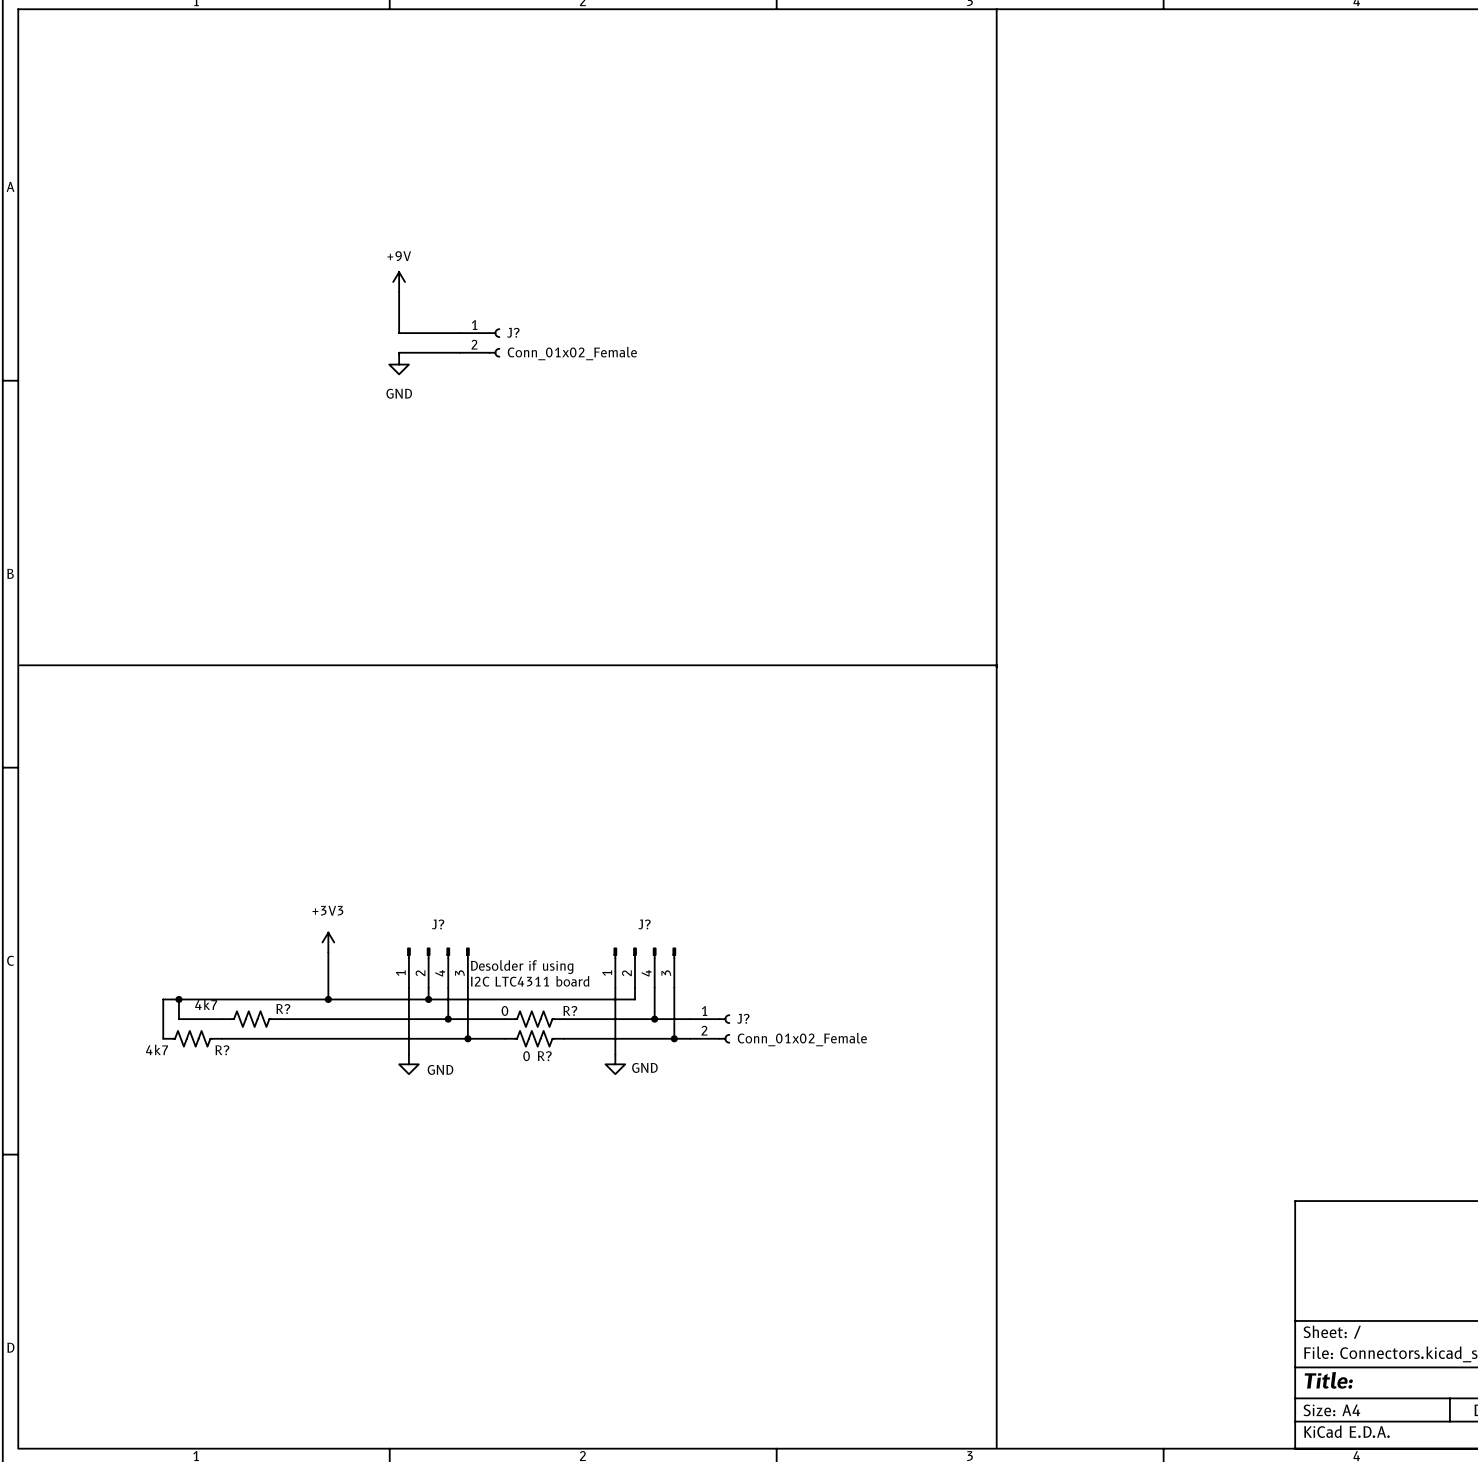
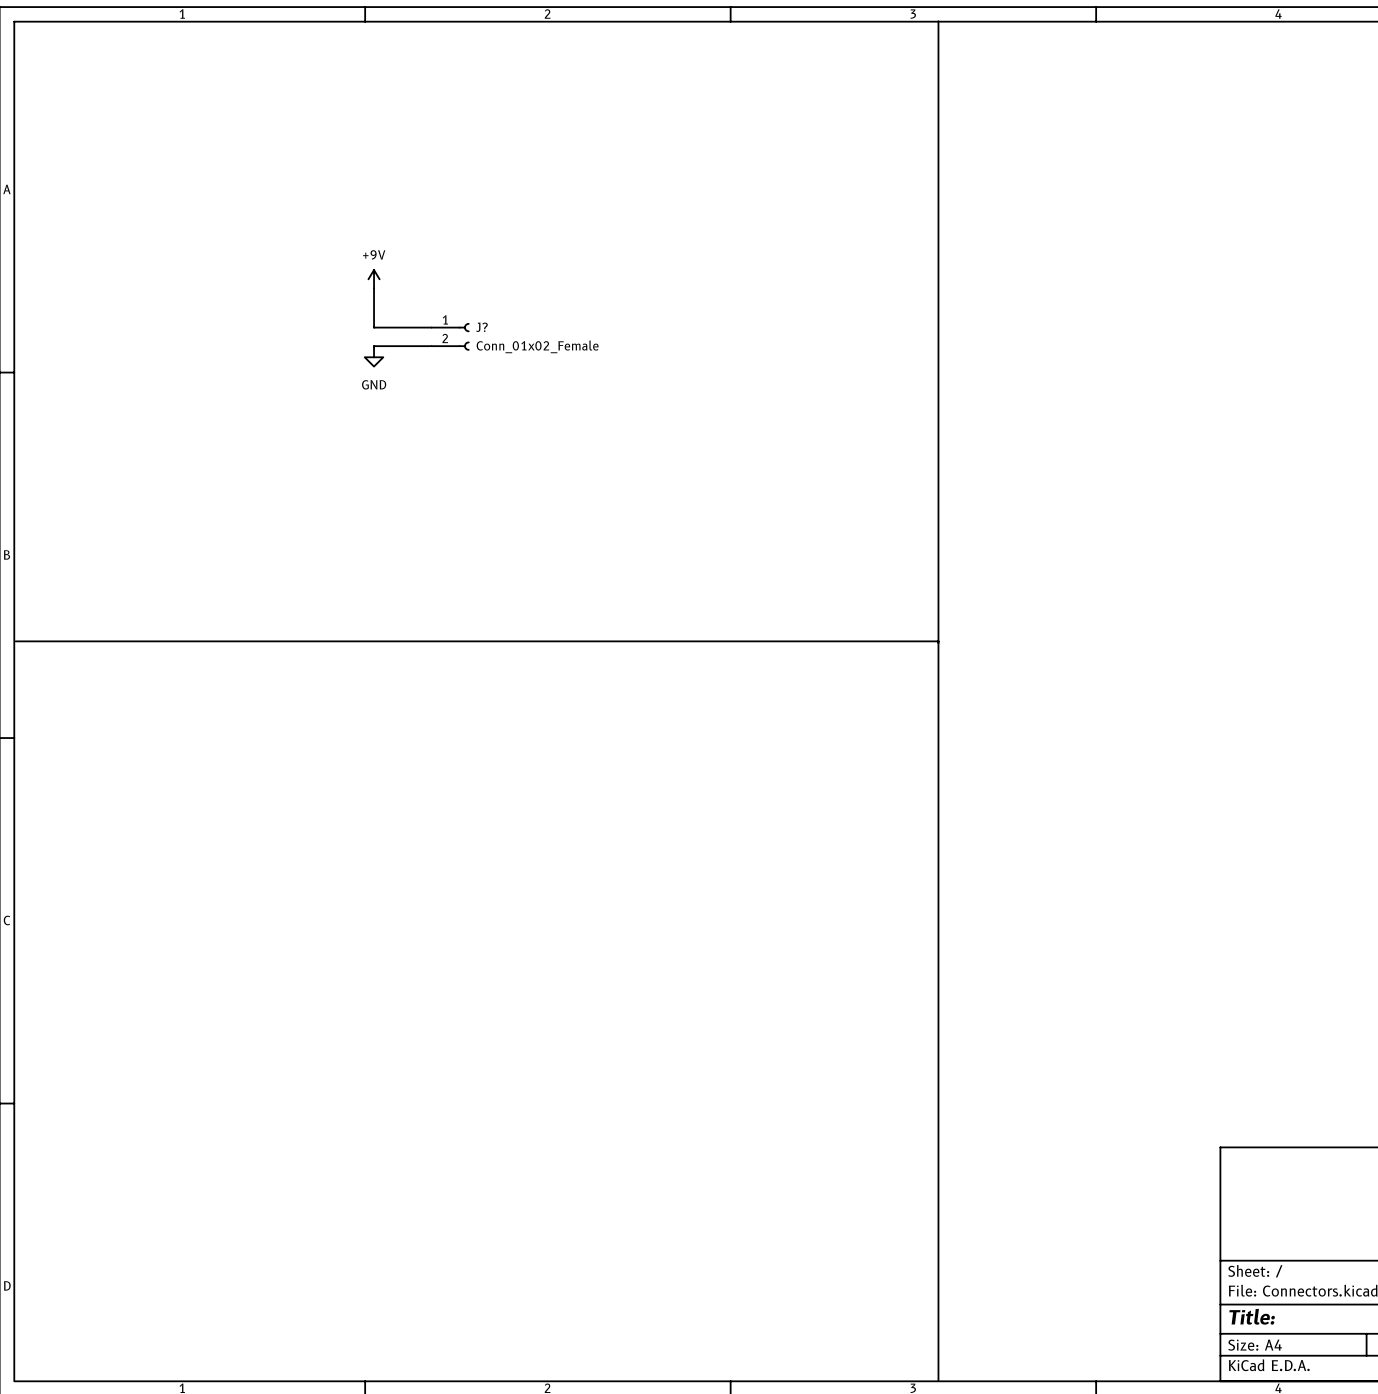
power symbol: +3V3 (328, 942) -> none
wire: (328, 952) (328, 999) -> none
J?: (438, 967) -> none
text: Desolder if using (522, 967) -> none
J?: (644, 967) -> none
text: I2C LTC4311 board (530, 981) -> none
wire: (408, 987) (408, 1054) -> none
wire: (428, 987) (428, 999) -> none
wire: (448, 987) (448, 1019) -> none
wire: (467, 987) (467, 1038) -> none
wire: (615, 987) (615, 1054) -> none
wire: (635, 987) (635, 999) (163, 999) (163, 1038) -> none
wire: (654, 987) (654, 1019) -> none
wire: (674, 987) (674, 1038) -> none
wire: (178, 999) (178, 1019) (222, 1019) -> none
junction: (178, 999) -> none
junction: (328, 999) -> none
junction: (428, 999) -> none
R?: 4k7 (251, 1019) -> none
wire: (281, 1019) (505, 1019) -> none
junction: (448, 1019) -> none
R?: 0 (534, 1019) -> none
wire: (564, 1019) (690, 1019) -> none
junction: (654, 1019) -> none
J?: Conn_01x02_Female (710, 1028) -> none
R?: 4k7 (192, 1038) -> none
wire: (222, 1038) (505, 1038) -> none
junction: (467, 1038) -> none
R?: 0 (534, 1038) -> none
wire: (564, 1038) (690, 1038) -> none
junction: (674, 1038) -> none
power symbol: GND (408, 1064) -> none
power symbol: GND (615, 1064) -> none

